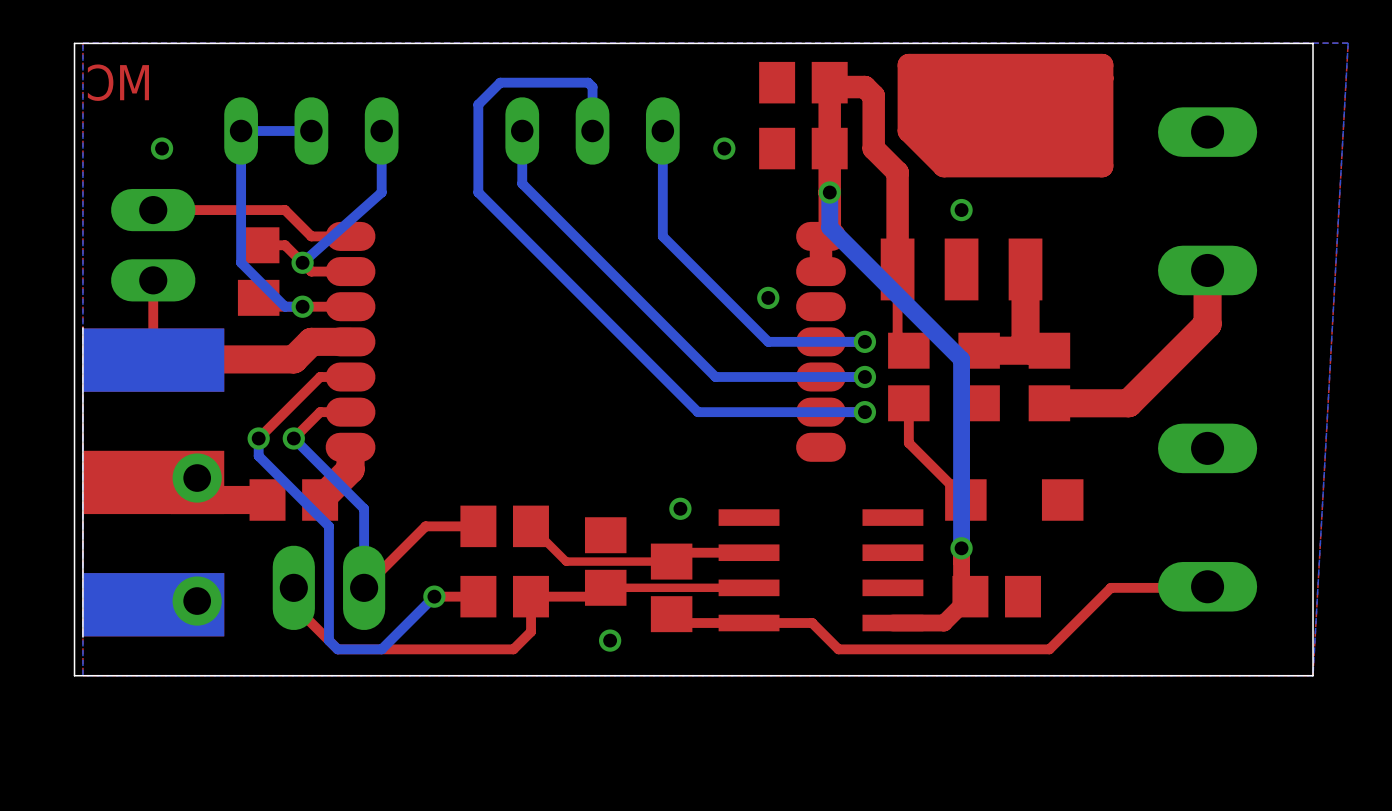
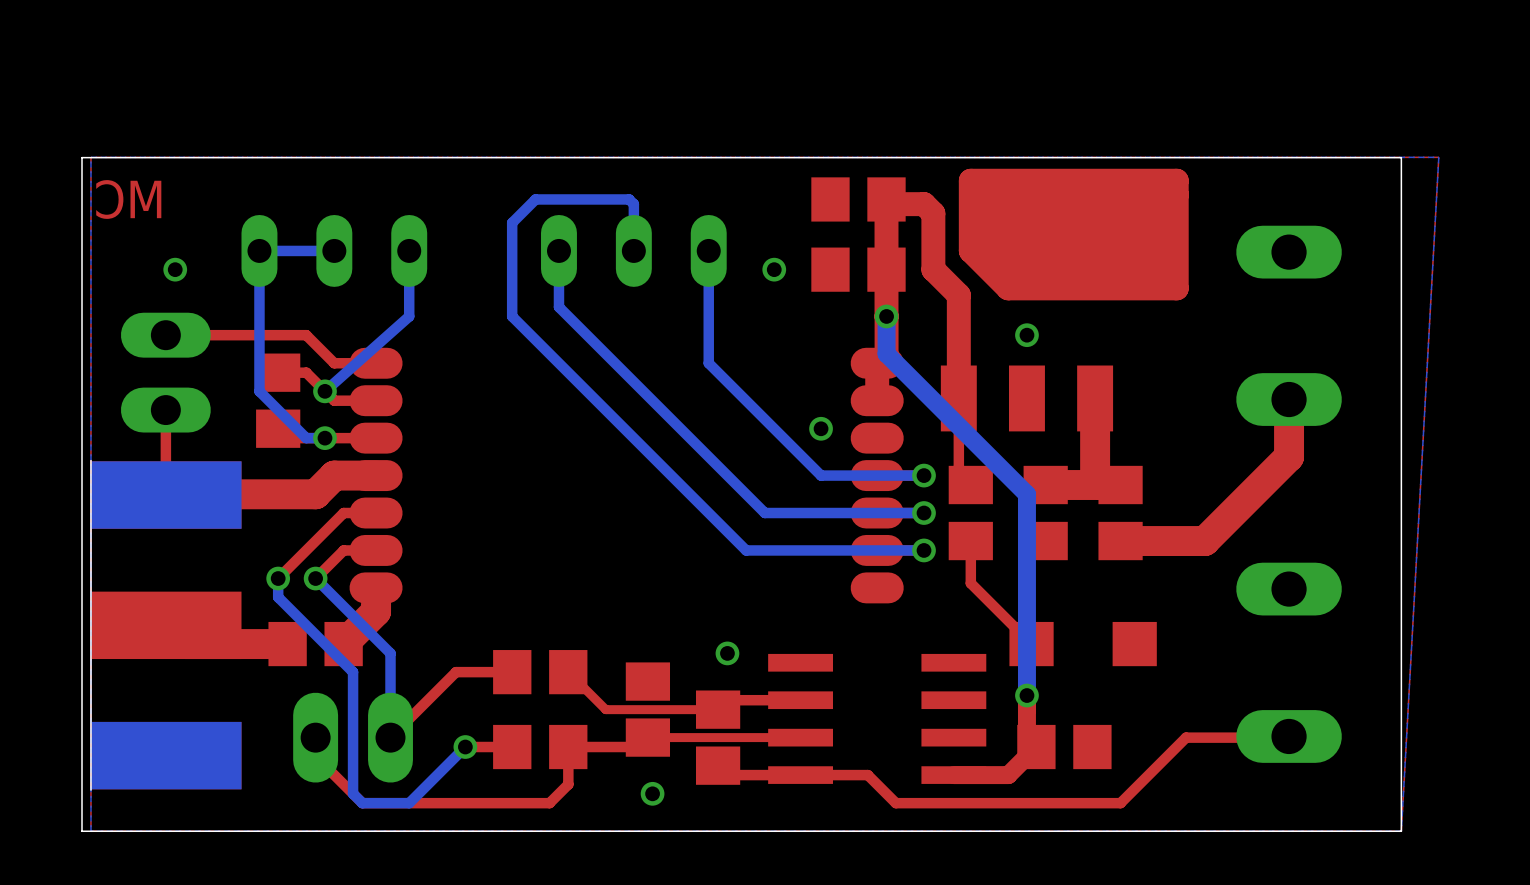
via: (197, 478) -> none
via: (197, 601) -> none

